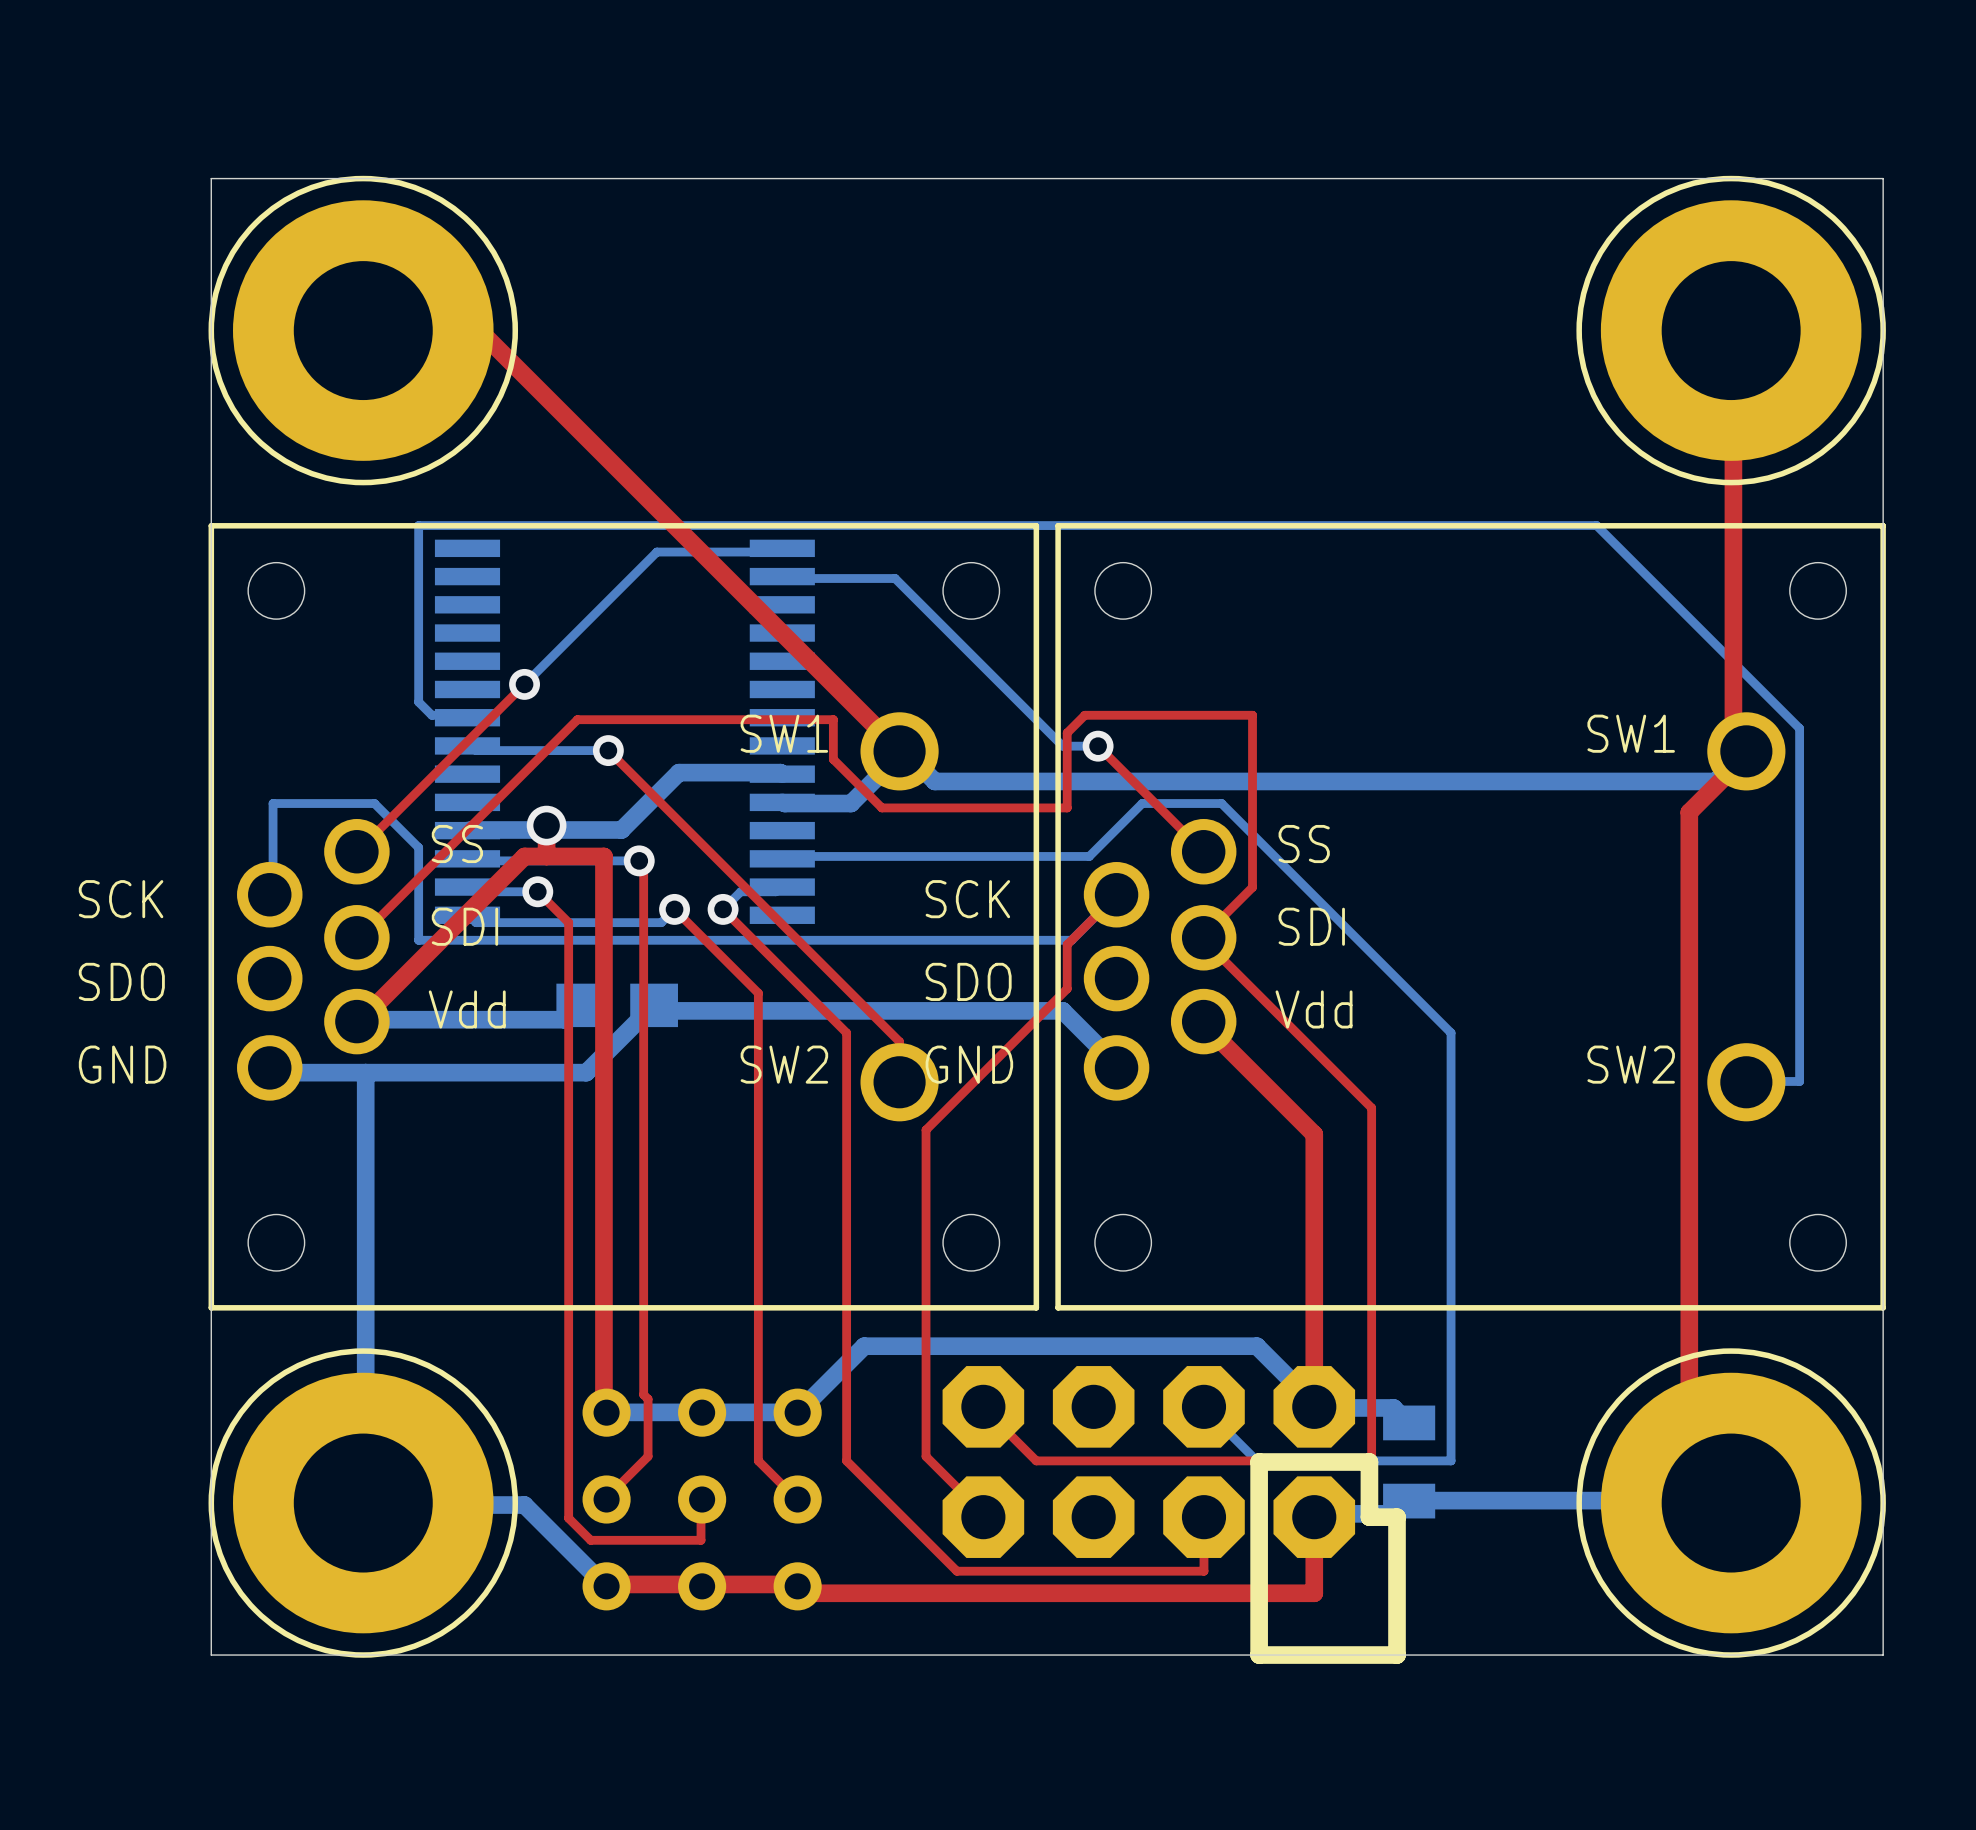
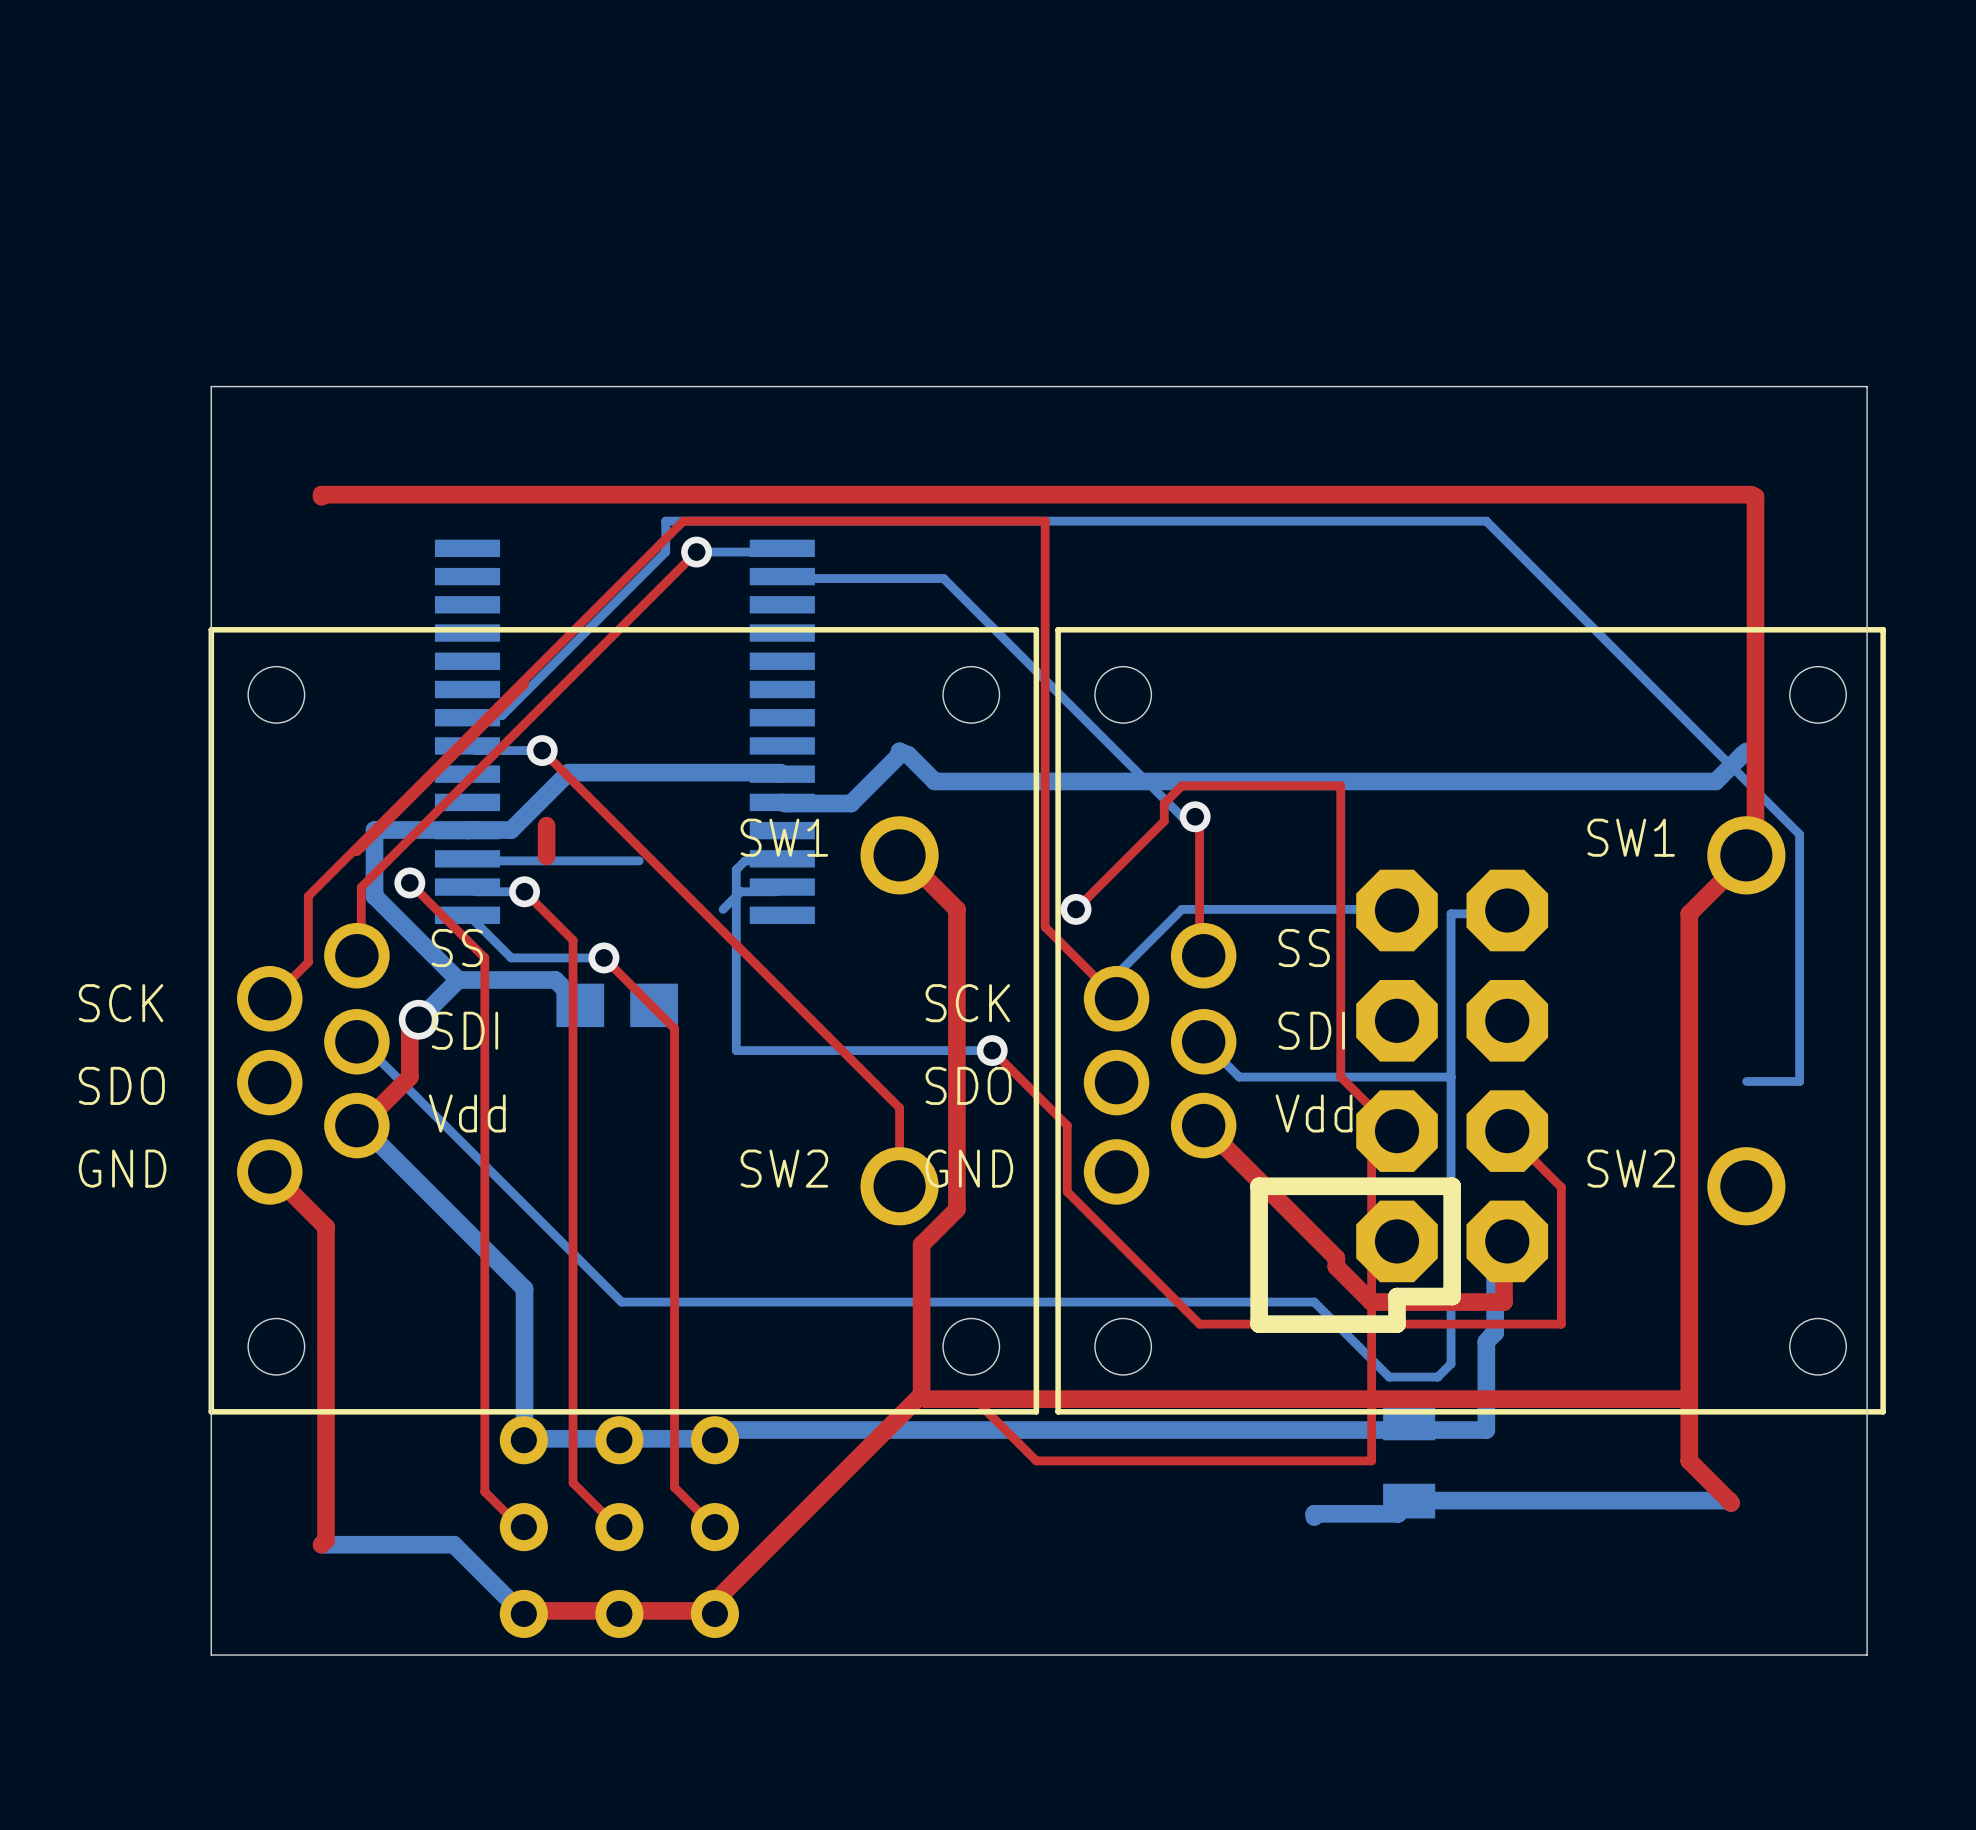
top track: (363, 330) (480, 331) (899, 750) -> none
part: (363, 330) -> none
top track: (1731, 330) (1733, 331) (1733, 741) (1742, 750) (1746, 751) (1742, 759) (1689, 812) (1689, 913) -> (321, 496) (321, 494) (1751, 494) (1755, 496) (1755, 843) (1746, 852) (1742, 860) (1689, 913)
part: (1731, 330) -> none
board edge: (211, 386) (211, 178) (1883, 178) (1883, 1655) (1867, 1655) -> (211, 386) (1867, 386) (1867, 1655)
bottom track: (696, 552) (656, 552) (524, 684) -> none
top track: none -> (696, 552) (361, 887) (361, 953) (356, 955)
via: none -> (696, 552)
bottom track: (895, 578) (1062, 746) (1098, 746) -> (895, 578) (943, 578) (1181, 816) (1195, 816)
via: (524, 684) -> none
bottom track: (467, 717) (467, 715) (431, 715) (418, 702) (418, 525) (1596, 525) (1799, 728) (1799, 834) -> (467, 717) (471, 715) (502, 715) (665, 552) (665, 521) (1486, 521) (1799, 834)
top track: (1098, 746) (1203, 851) -> none
via: (1098, 746) -> none
bottom track: (542, 750) (608, 750) -> none
top track: none -> (542, 750) (899, 1107) (899, 1186)
via: none -> (542, 750)
top track: (608, 750) (899, 1041) (899, 1081) -> none
via: (608, 750) -> none
bottom track: (678, 772) (621, 829) (511, 829) -> (678, 772) (568, 772) (511, 829)
top track: none -> (1195, 816) (1199, 821) (1199, 953) (1203, 955)
via: none -> (1195, 816)
via position: (546, 825) -> (418, 1019)
bottom track: none -> (467, 829) (374, 829) (374, 896) (458, 980)
top track: none -> (899, 855) (903, 856) (956, 909) (956, 1209) (921, 1244) (921, 1394)
bottom track: (782, 858) (784, 856) (1089, 856) (1142, 803) (1221, 803) (1451, 1032) -> (782, 858) (780, 860) (745, 860) (736, 869) (736, 1050) (992, 1050)
top track: (639, 860) (643, 865) (643, 1394) (648, 1399) (648, 1456) (606, 1499) -> none
via: (639, 860) -> none
top track: none -> (409, 882) (484, 957) (484, 1491) (520, 1527) (523, 1527)
via: none -> (409, 882)
top track: none -> (524, 891) (573, 940) (573, 1482) (617, 1527) (619, 1527)
top track: (537, 891) (568, 922) (568, 1518) (590, 1540) (701, 1540) (702, 1499) -> none
via position: (537, 891) -> (524, 891)
bottom track: (269, 894) (273, 891) (273, 803) (374, 803) (418, 847) (418, 940) (1071, 940) (1116, 894) -> none
top track: (1116, 894) (1067, 944) (1067, 988) (926, 1130) (926, 1456) (983, 1513) (983, 1517) -> none
bottom track: (674, 909) (661, 922) (476, 922) -> (603, 957) (511, 957) (476, 922)
top track: (674, 909) (758, 993) (758, 1460) (797, 1499) -> none
via: (674, 909) -> none
top track: (723, 909) (846, 1032) (846, 1460) (956, 1571) (1203, 1571) (1203, 1517) -> none
via: (723, 909) -> none
via: none -> (1076, 909)
bottom track: none -> (1397, 910) (1181, 909) (1120, 971) (1120, 997) (1116, 998)
bottom track: none -> (1507, 910) (1503, 913) (1451, 913) (1451, 1032)
part position: (623, 916) -> (623, 1020)
part position: (1470, 916) -> (1470, 1020)
top track: (356, 937) (361, 935) (577, 719) (833, 719) (833, 759) (881, 807) (1067, 807) (1067, 732) (1084, 715) (1252, 715) (1252, 887) (1203, 935) (1203, 940) (1340, 1077) -> (1076, 909) (1164, 821) (1164, 803) (1181, 785) (1340, 785) (1340, 1077)
top track: none -> (603, 957) (674, 1028) (674, 1487) (714, 1527)
via: none -> (603, 957)
bottom track: none -> (458, 980) (418, 1019)
top track: none -> (269, 998) (308, 962) (308, 896) (683, 521) (1045, 521) (1045, 927) (1116, 998)
bottom track: (580, 1005) (564, 1019) (361, 1019) (356, 1021) -> (580, 1005) (555, 980) (458, 980)
top track: none -> (418, 1019) (409, 1028) (409, 1077) (361, 1125) (356, 1125)
top track: (356, 1021) (361, 1019) (524, 856) (603, 856) (603, 1412) (606, 1412) -> none
top track: (1203, 1021) (1203, 1024) (1314, 1134) (1314, 1406) -> none
bottom track: none -> (1203, 1041) (1239, 1077) (1451, 1077)
top track: none -> (992, 1050) (1067, 1125) (1067, 1191) (1199, 1324) (1561, 1324) (1561, 1187) (1507, 1131)
via: none -> (992, 1050)
bottom track: (269, 1067) (277, 1072) (586, 1072) (654, 1005) (661, 1010) (1062, 1010) (1115, 1063) (1116, 1067) -> none
bottom track: (365, 1072) (365, 1496) (363, 1503) (365, 1505) (524, 1505) (606, 1586) -> none
bottom track: none -> (356, 1125) (361, 1125) (524, 1288) (523, 1440) (714, 1440) (714, 1430) (1486, 1430) (1486, 1341) (1495, 1332) (1495, 1244) (1503, 1244) (1507, 1241)
top track: none -> (1203, 1125) (1336, 1257) (1336, 1266) (1371, 1302) (1503, 1302) (1503, 1244) (1507, 1241)
top track: none -> (269, 1171) (326, 1227) (326, 1540) (321, 1544)
line: none -> (1259, 1186) (1452, 1186) (1452, 1296) (1397, 1296) (1397, 1324) (1259, 1324) (1259, 1186)
bottom track: (1451, 1363) (1451, 1460) (1256, 1460) (1203, 1406) -> (1451, 1363) (1437, 1377) (1389, 1377) (1314, 1302) (621, 1302) (361, 1041) (356, 1041)
top track: none -> (921, 1394) (714, 1602) (714, 1613) (714, 1610) (626, 1610) (619, 1613) (617, 1610) (524, 1610) (523, 1613)
top track: none -> (921, 1394) (926, 1399) (1689, 1399)
bottom track: (606, 1412) (797, 1412) (864, 1346) (1256, 1346) (1309, 1399) (1314, 1407) (1393, 1407) (1409, 1422) -> none
part rotation: 0° (1148, 1462) -> 90° clockwise (1452, 1075)
part position: (1148, 1462) -> (1452, 1075)
line: (1259, 1462) (1259, 1655) (1397, 1655) (1397, 1517) (1369, 1517) (1369, 1462) (1259, 1462) -> none
part position: (702, 1499) -> (619, 1527)
part: (363, 1503) -> none
part: (1731, 1503) -> none
top track: (1314, 1517) (1314, 1593) (802, 1593) (793, 1584) (709, 1584) (702, 1586) (701, 1584) (608, 1584) (606, 1586) -> none
bottom track: none -> (321, 1544) (453, 1544) (523, 1613)

